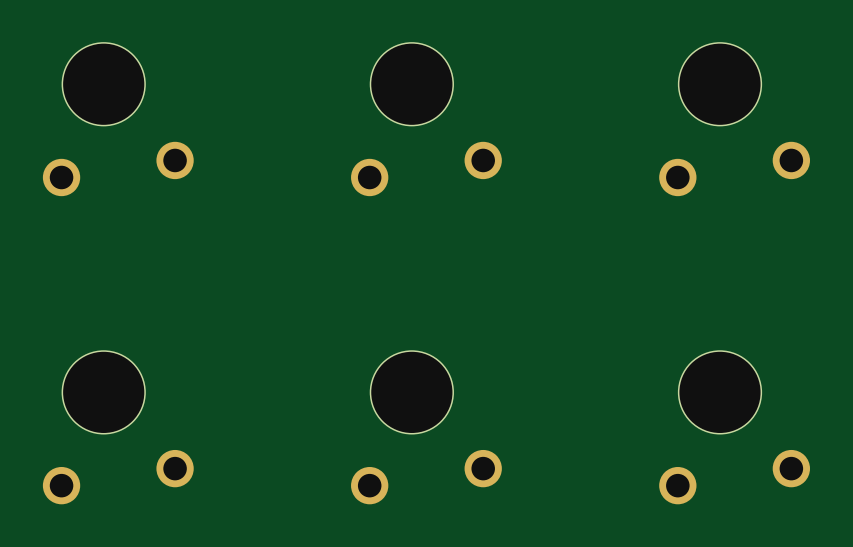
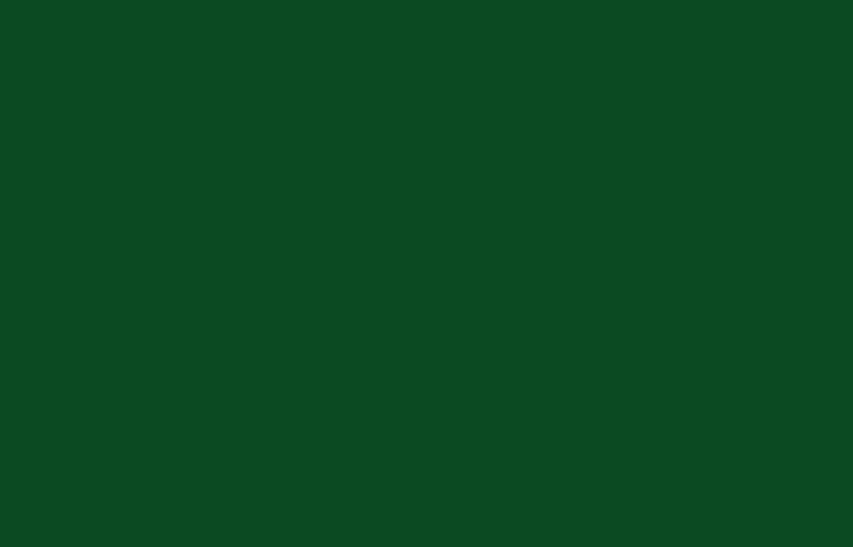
part: (118, 119) -> none
part: (426, 119) -> none
part: (734, 119) -> none
part: (118, 427) -> none
part: (426, 427) -> none
part: (734, 427) -> none

